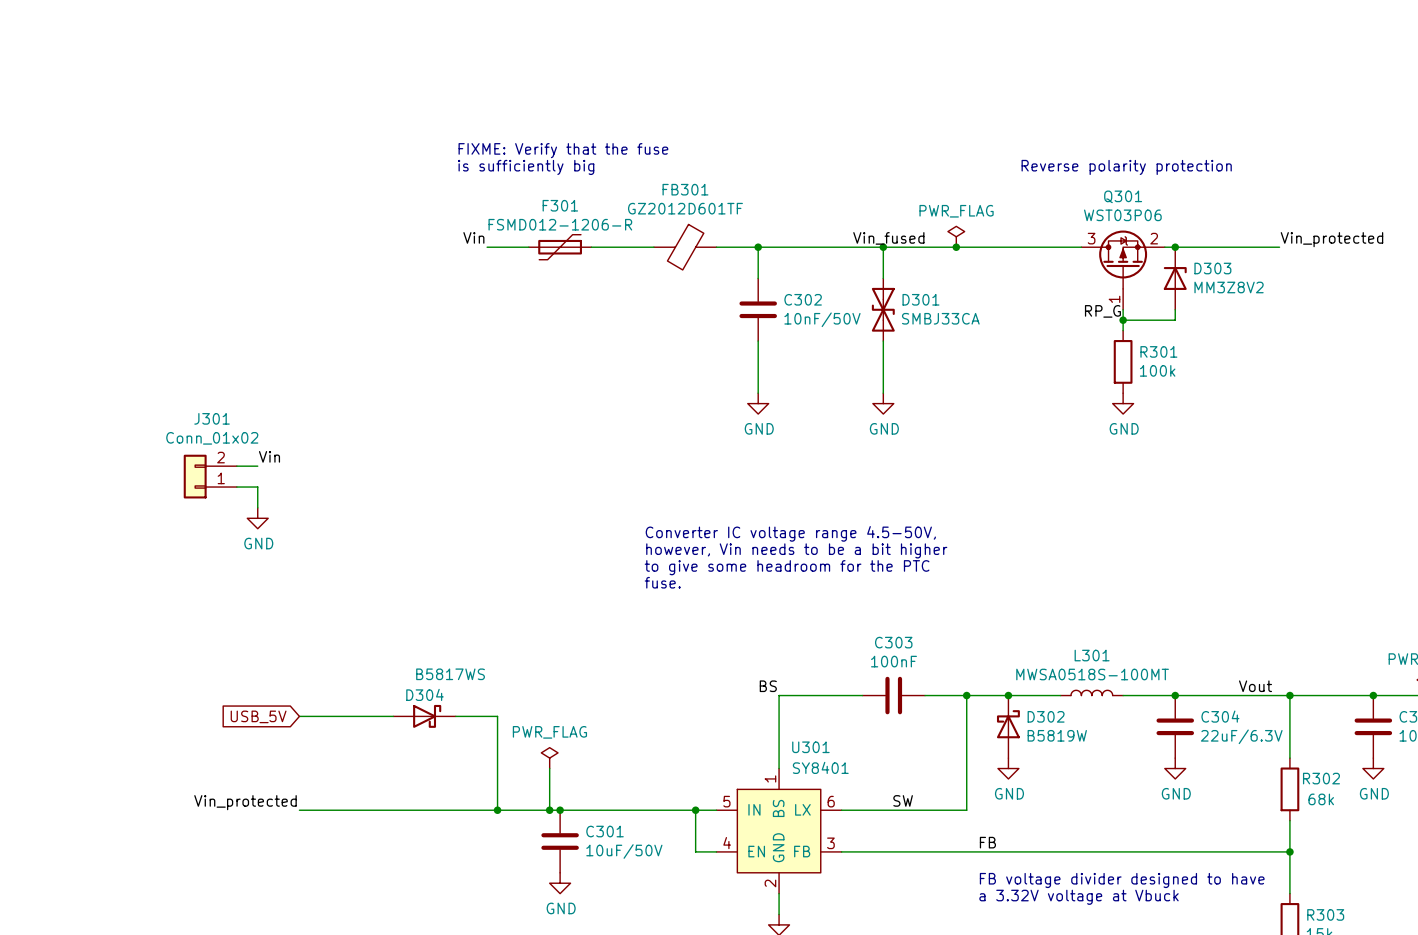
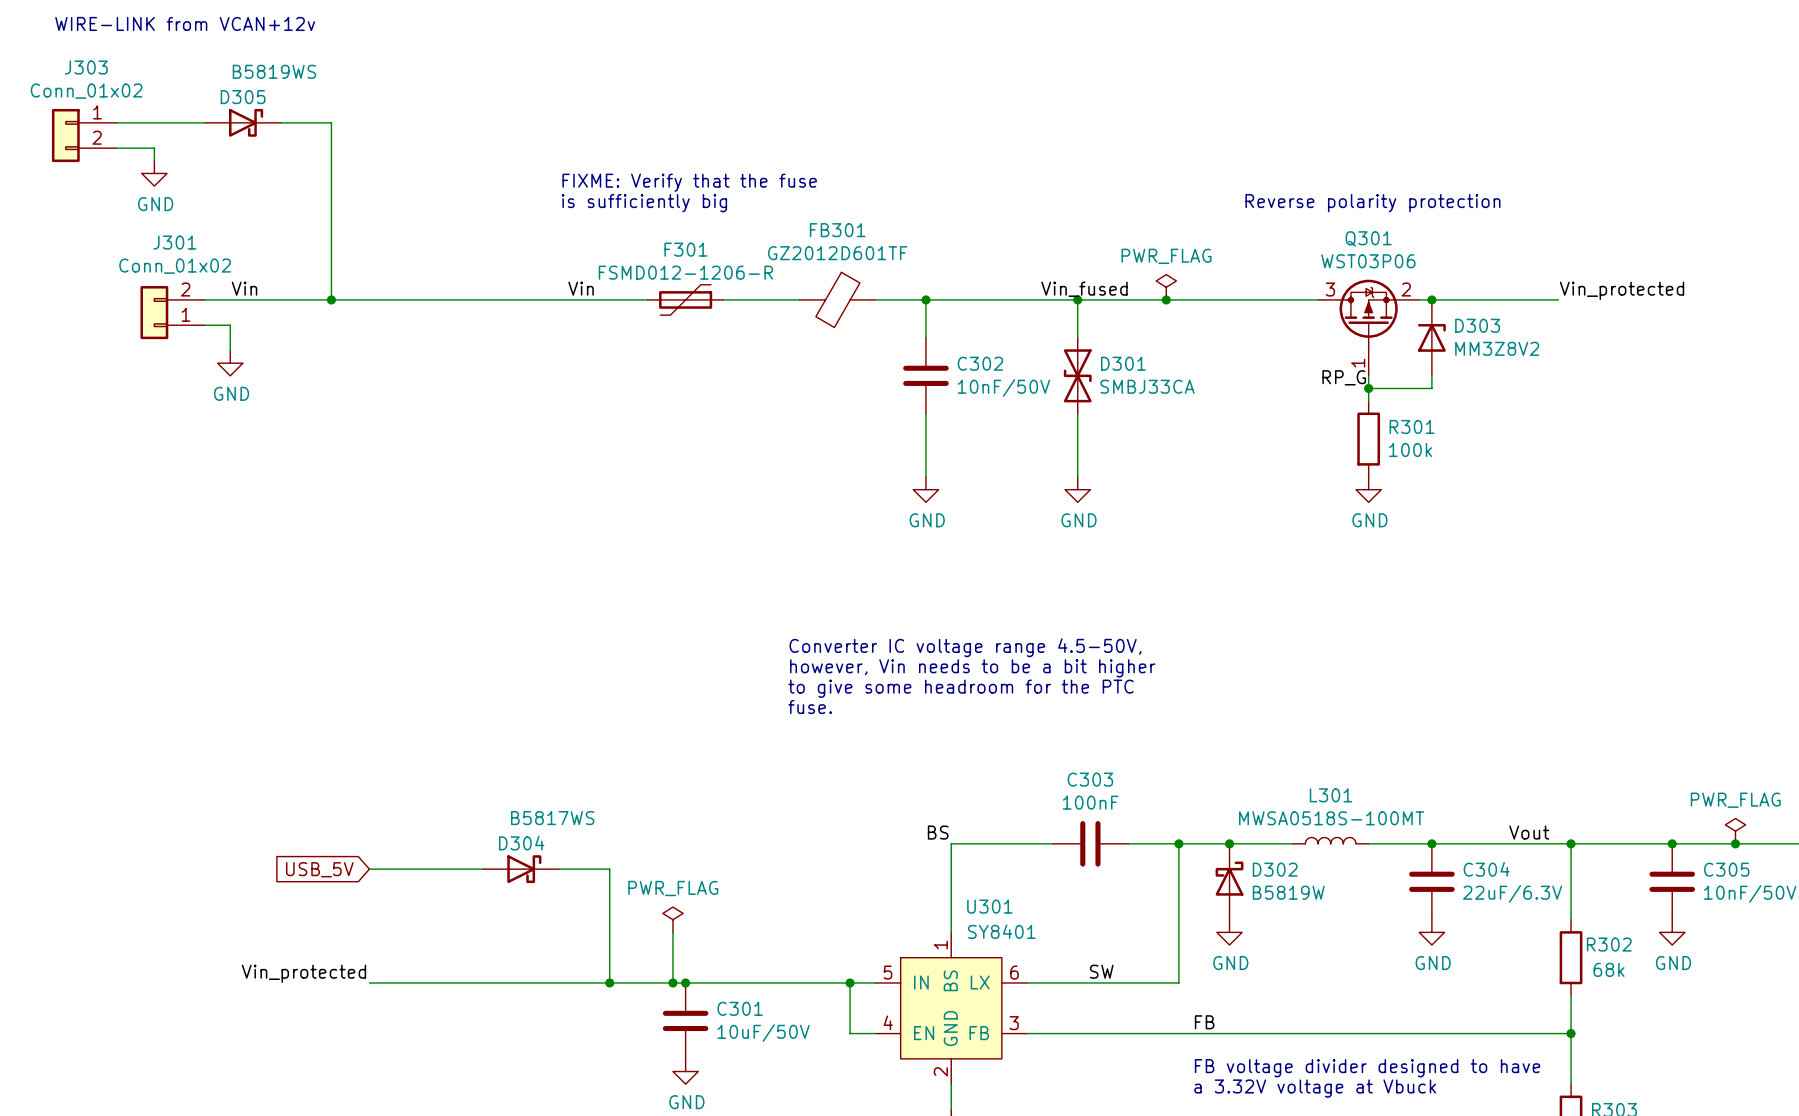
text: none -> WIRE-LINK from VCAN+12v (185, 23)
wire: none -> (116, 122) (204, 122)
D305: none -> B5819WS (242, 122)
wire: none -> (280, 122) (331, 122) (331, 299)
J303: none -> Conn_01x02 (84, 135)
wire: none -> (116, 148) (154, 148) (154, 160)
power symbol: none -> GND (154, 173)
label: none -> Vin (244, 288)
wire: none -> (204, 299) (597, 299)
junction: none -> (331, 299)
wire: none -> (204, 325) (230, 325) (230, 350)
power symbol: none -> GND (230, 363)
label: Vin (269, 456) -> none
wire: (236, 466) (257, 466) -> none
J301 position: (210, 476) -> (172, 312)
wire: (236, 487) (257, 487) (257, 507) -> none
power symbol: GND (257, 518) -> none

